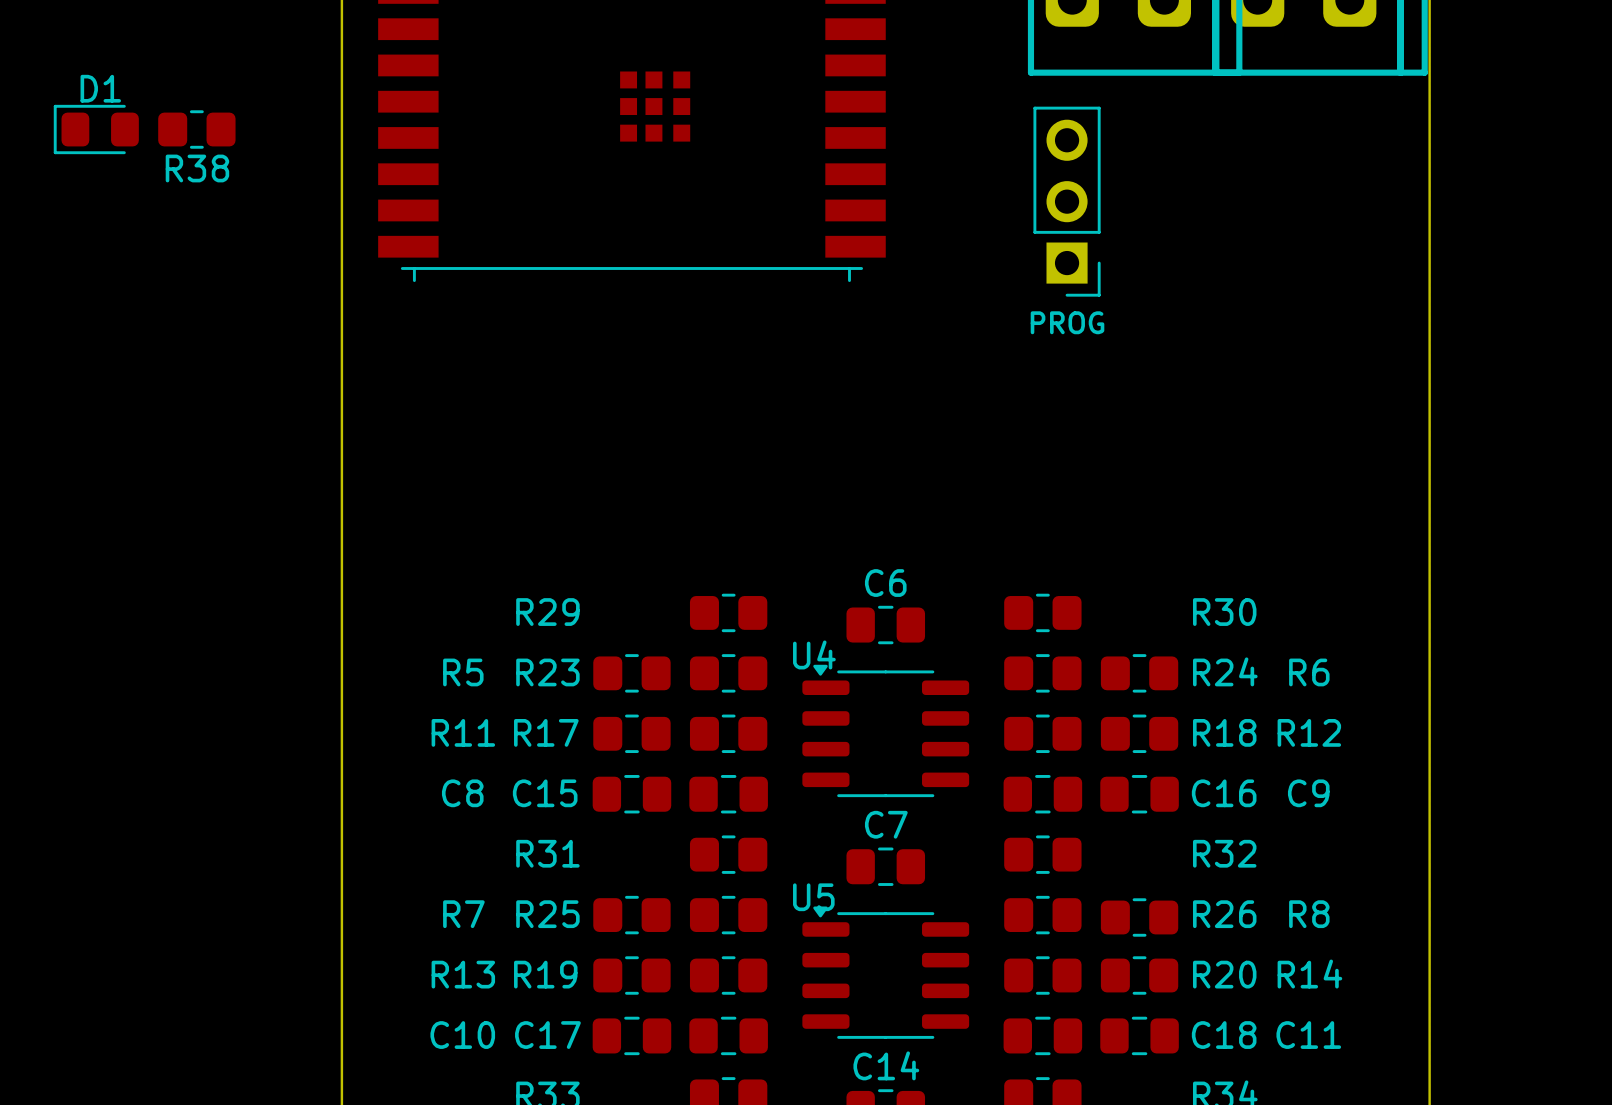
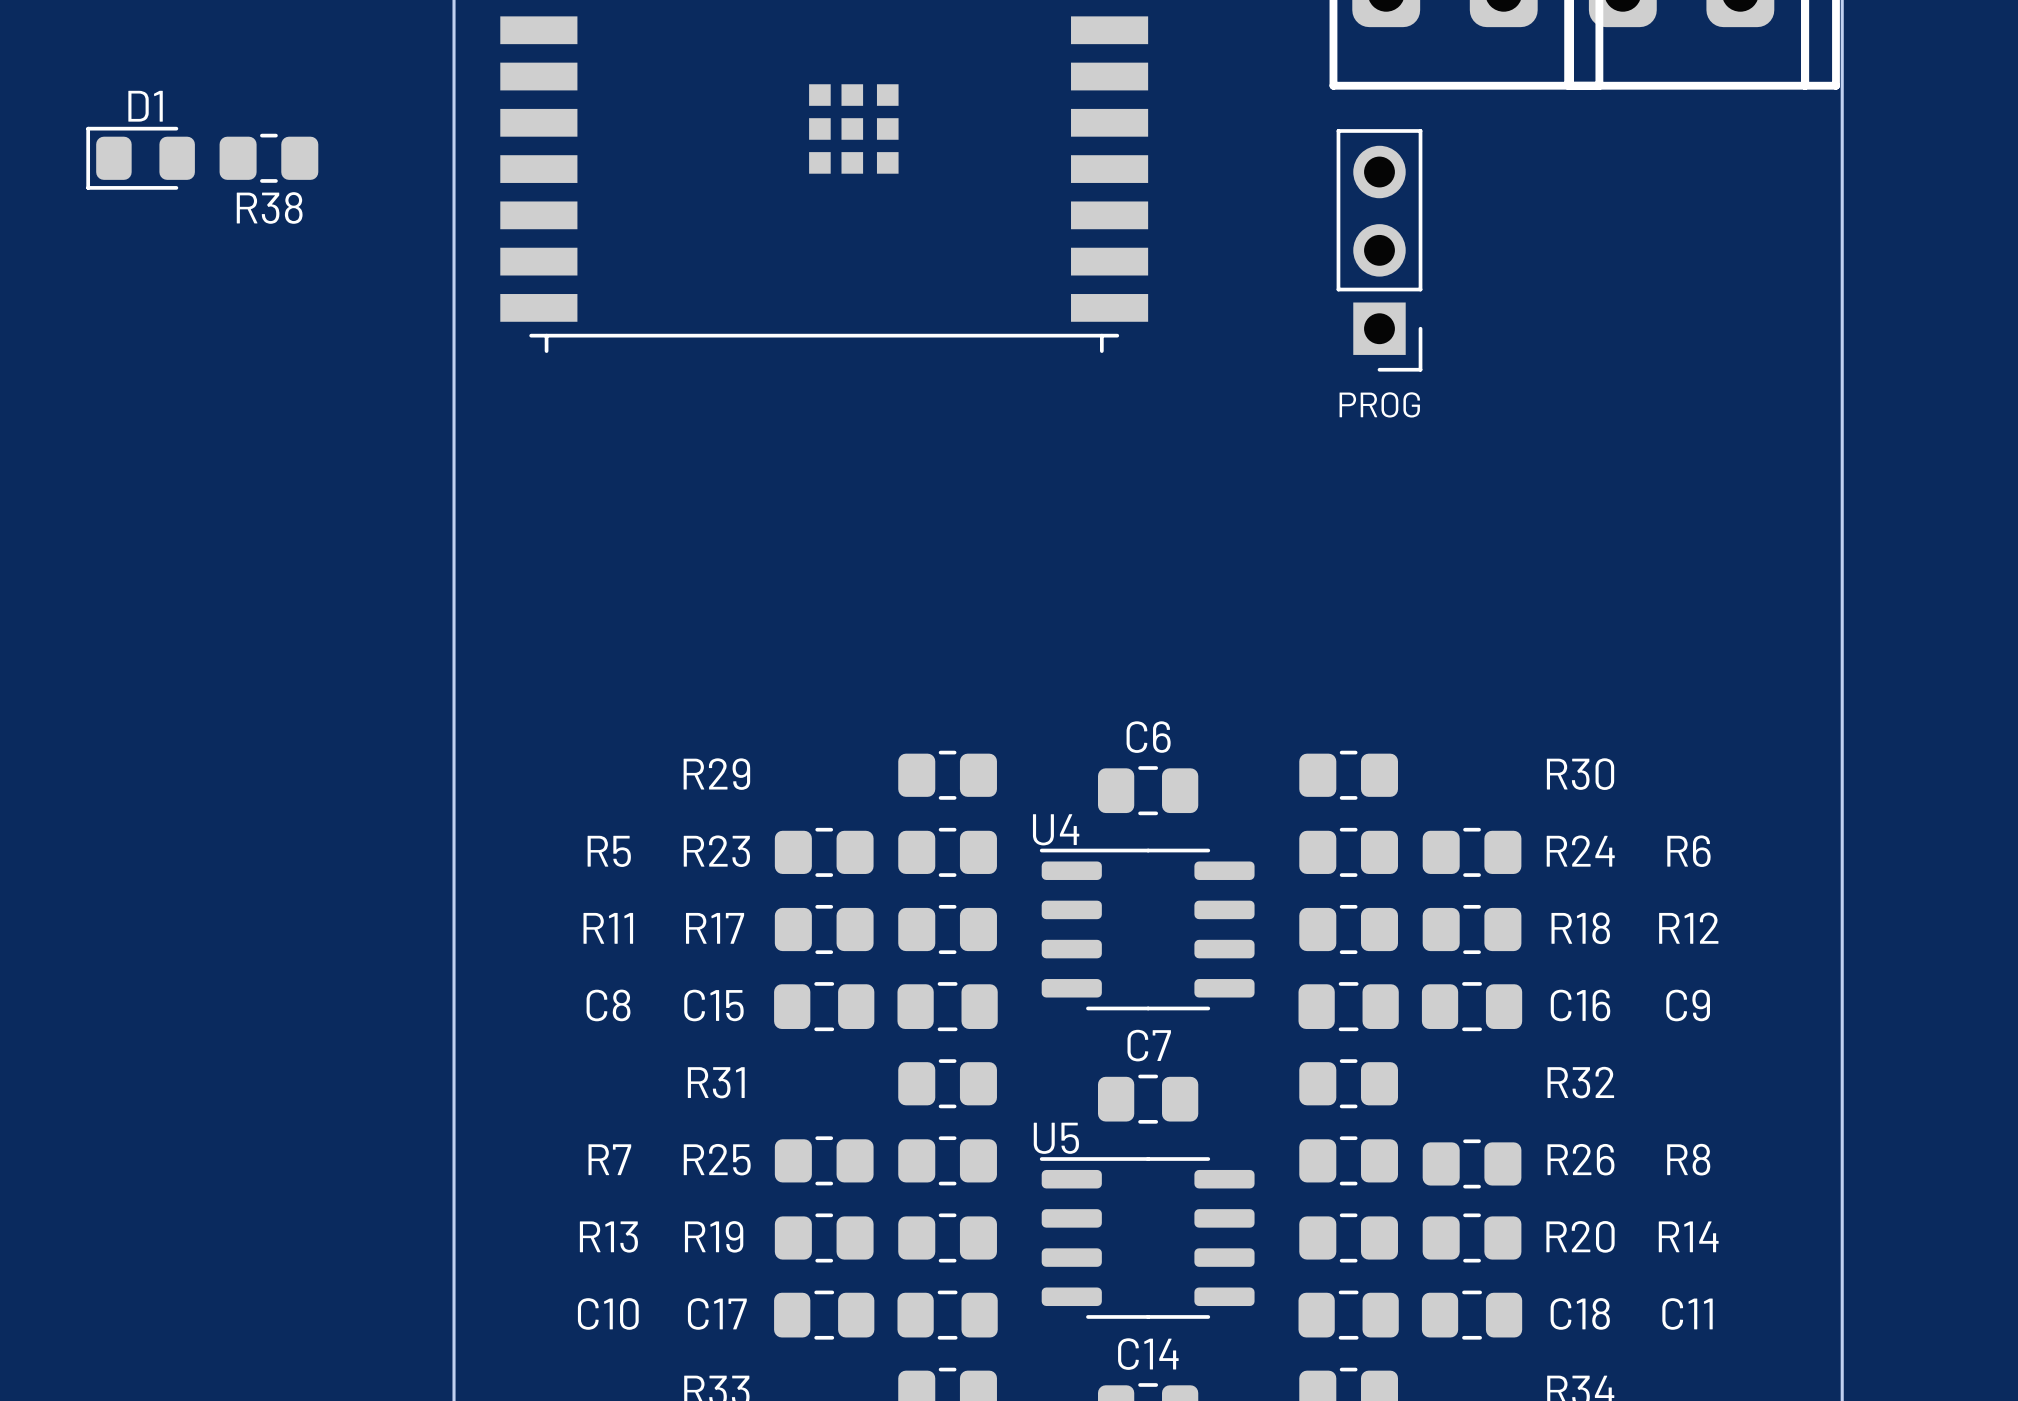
U4 footprint: [802, 664, 970, 798] -> [1039, 848, 1255, 1011]
U5 footprint: [802, 906, 970, 1039] -> [1039, 1157, 1255, 1319]

